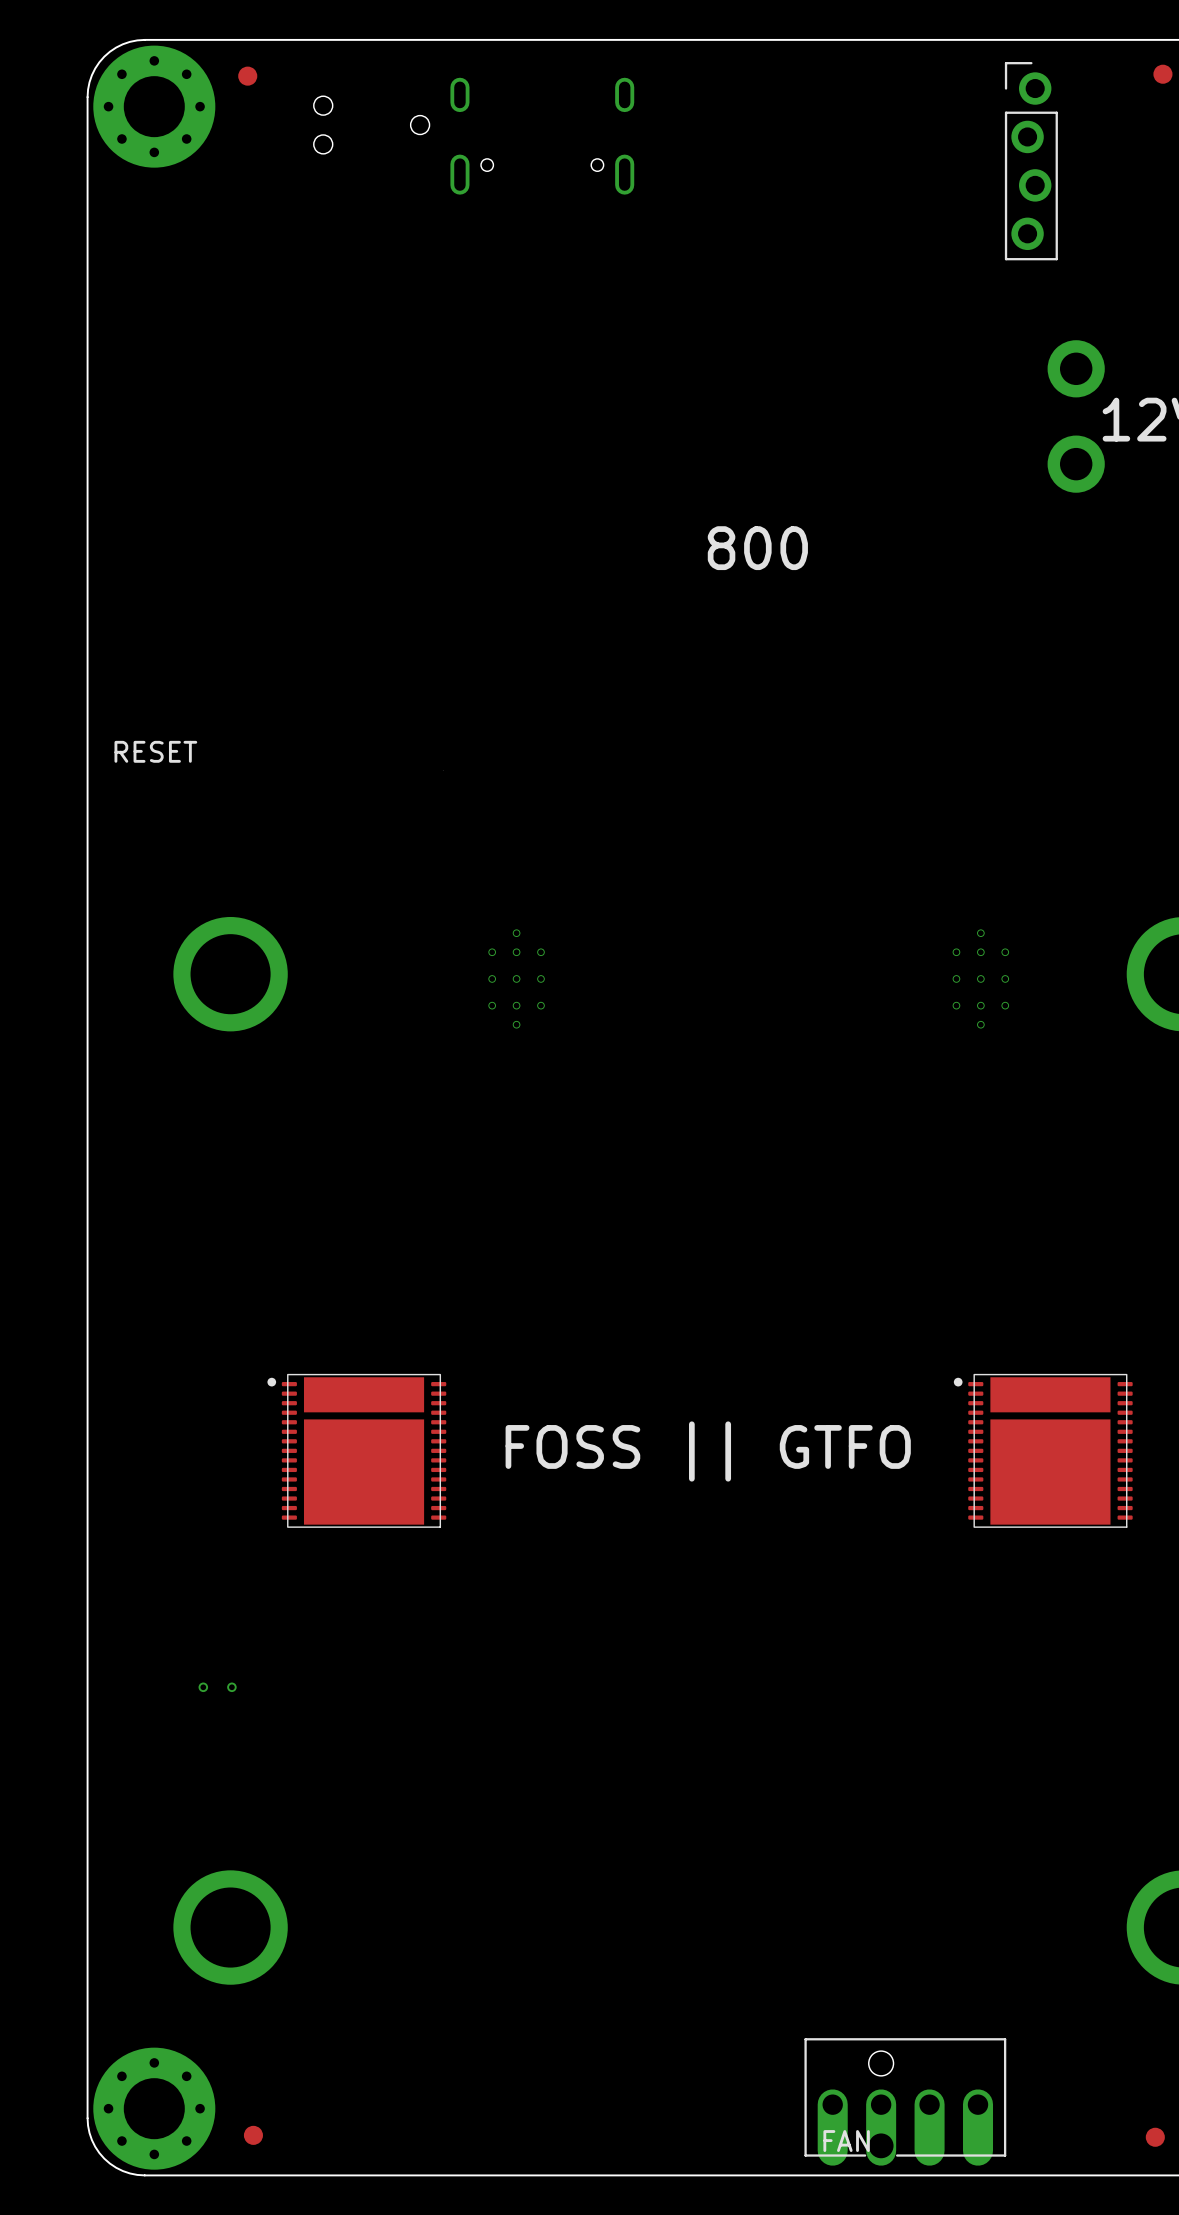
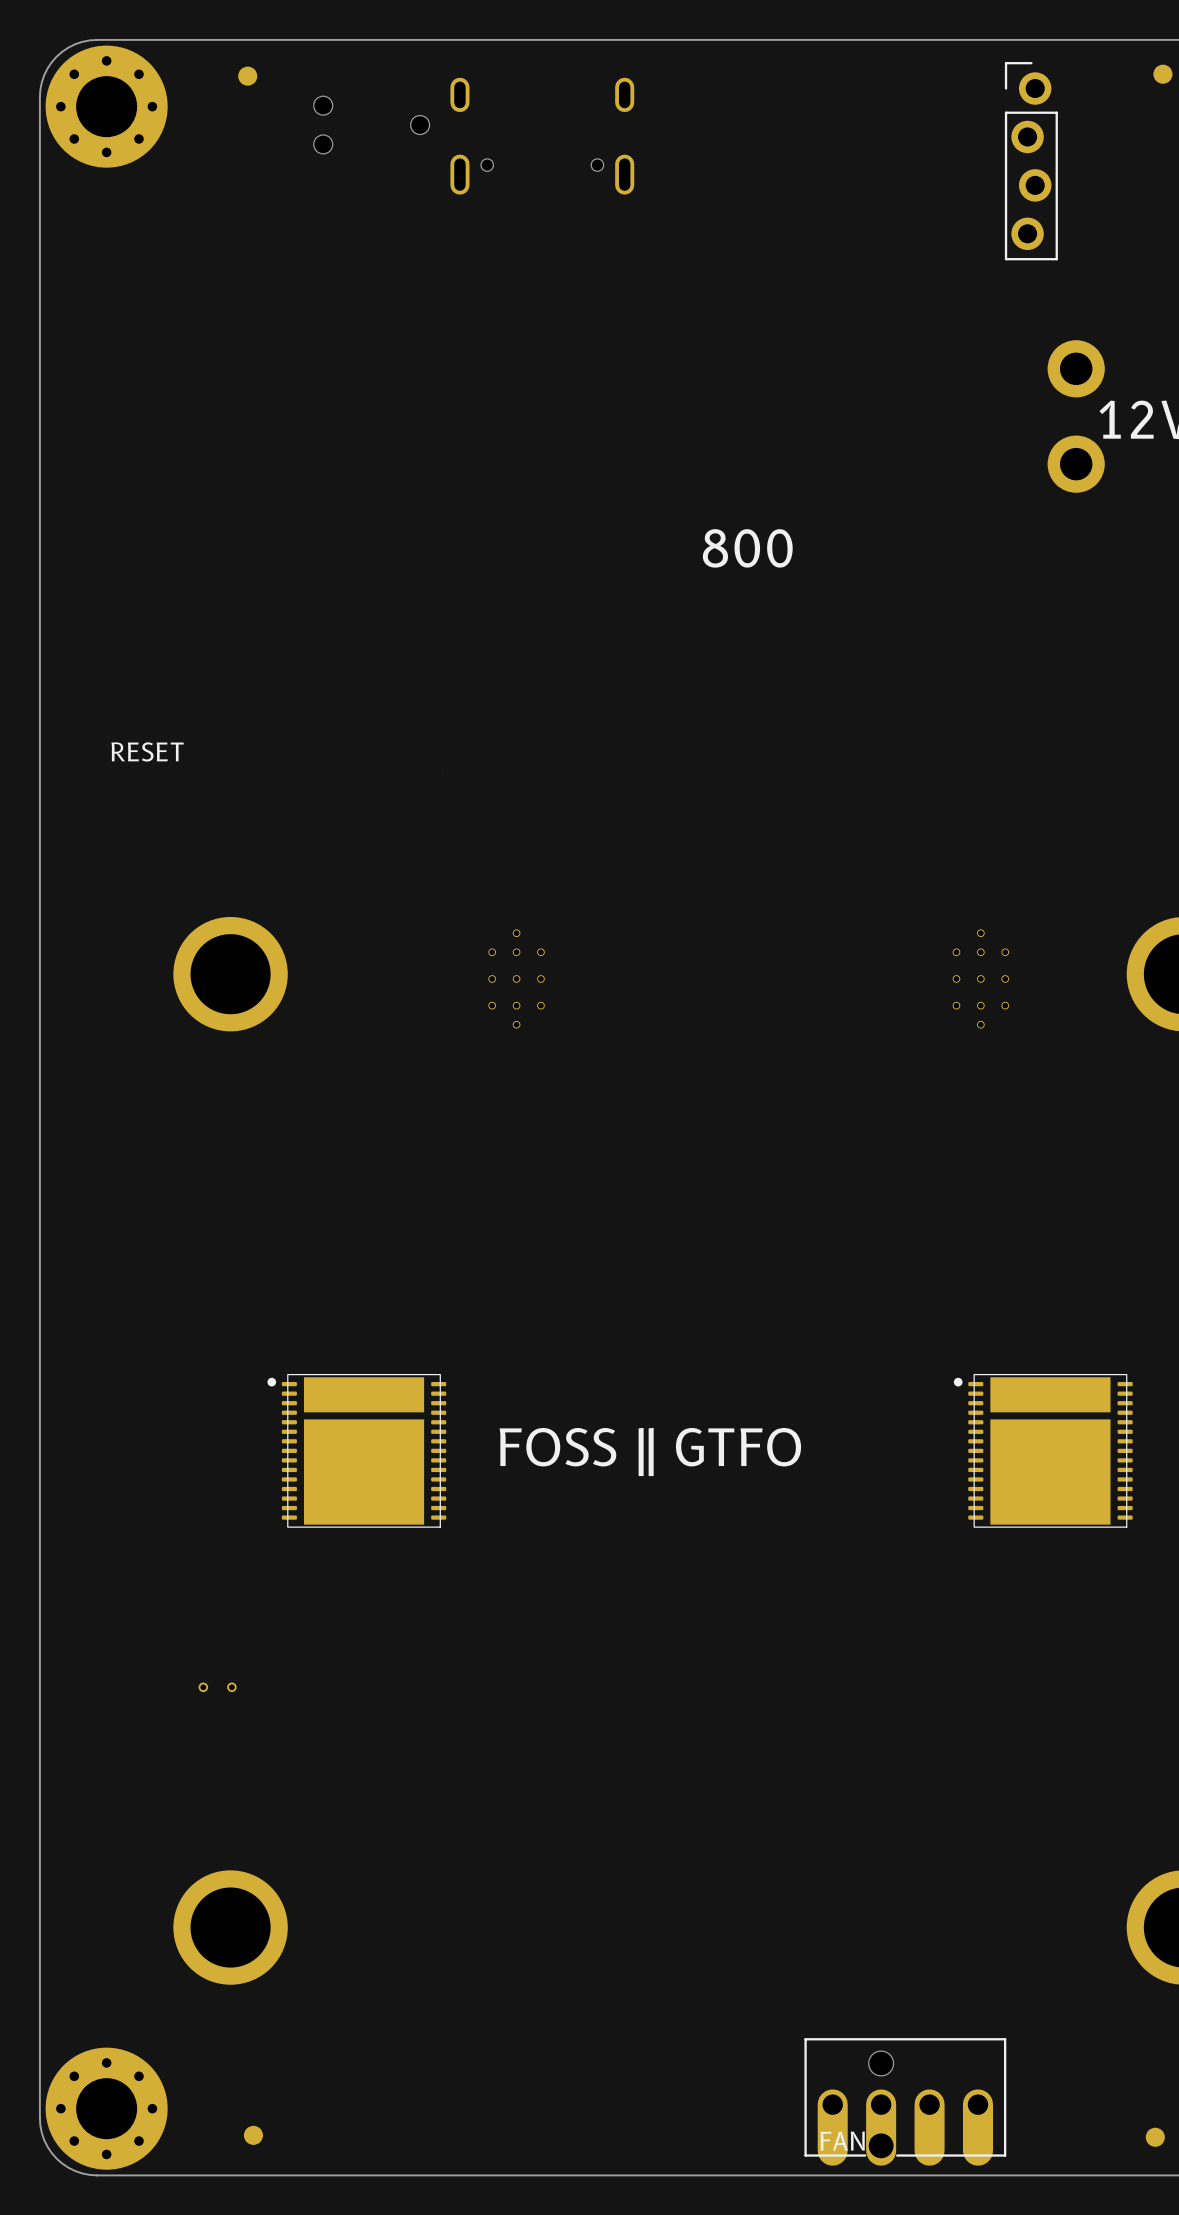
board edge: (144, 39) (122, 44) (104, 56) (91, 75) (87, 97) (87, 2118) (91, 2140) (104, 2158) (122, 2171) (144, 2175) -> (144, 39) (89, 40) (68, 47) (56, 56) (47, 68) (41, 82) (39, 97) (39, 2118) (41, 2133) (47, 2146) (56, 2158) (68, 2167) (89, 2174) (144, 2175)
part position: (154, 106) -> (106, 106)
part position: (154, 2108) -> (106, 2108)

